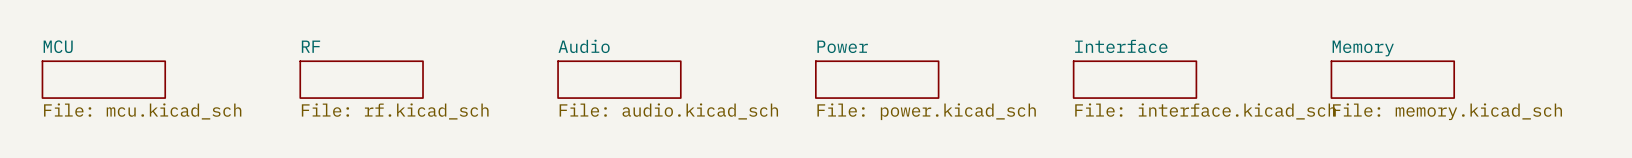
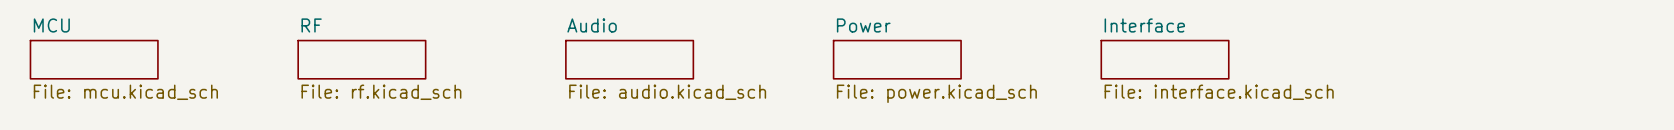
sheet Memory: File: memory.kicad_sch (1392, 79) -> none

